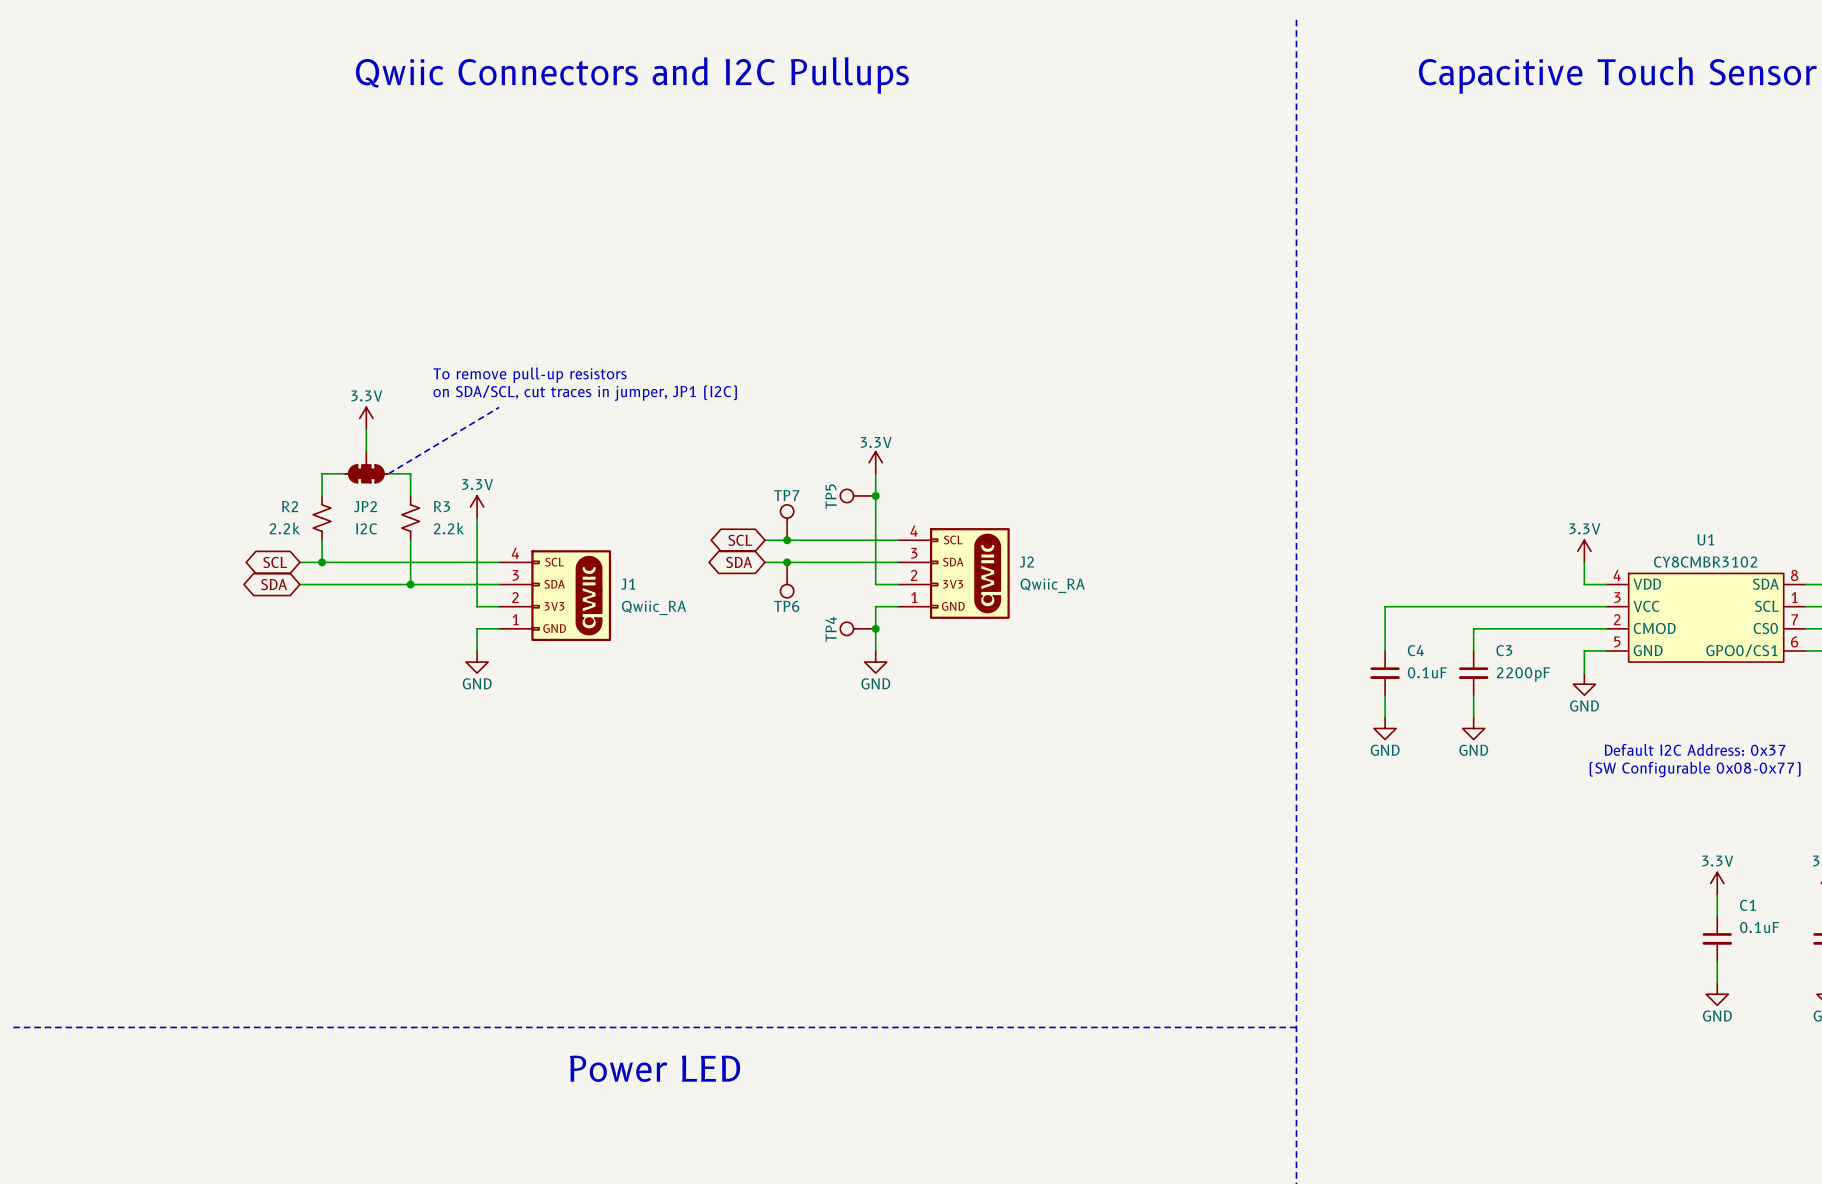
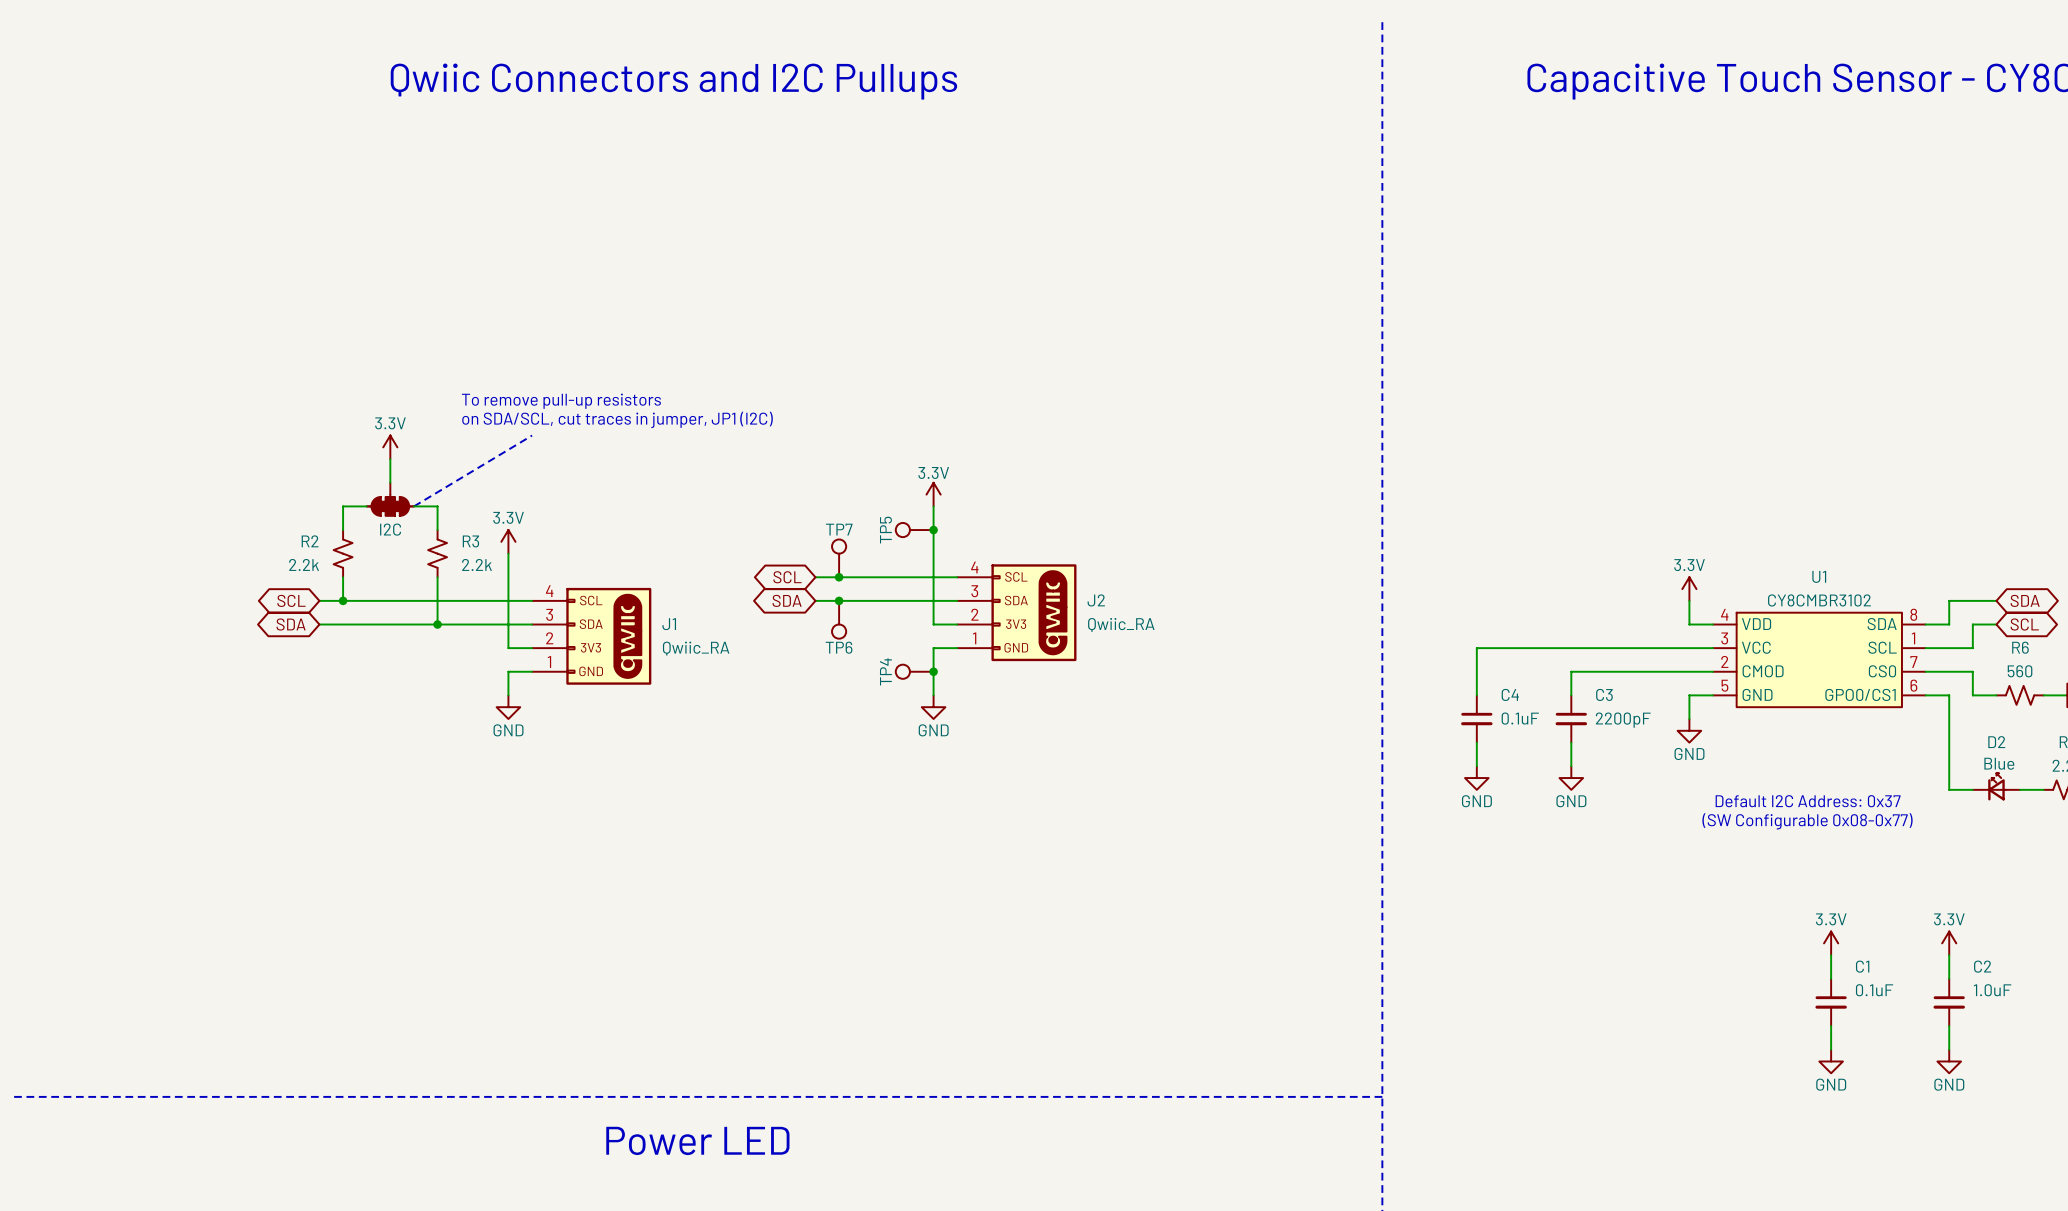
JP2 name: JP2 (365, 506) -> none
JP2 value position: I2C (366, 528) -> I2C (390, 529)

